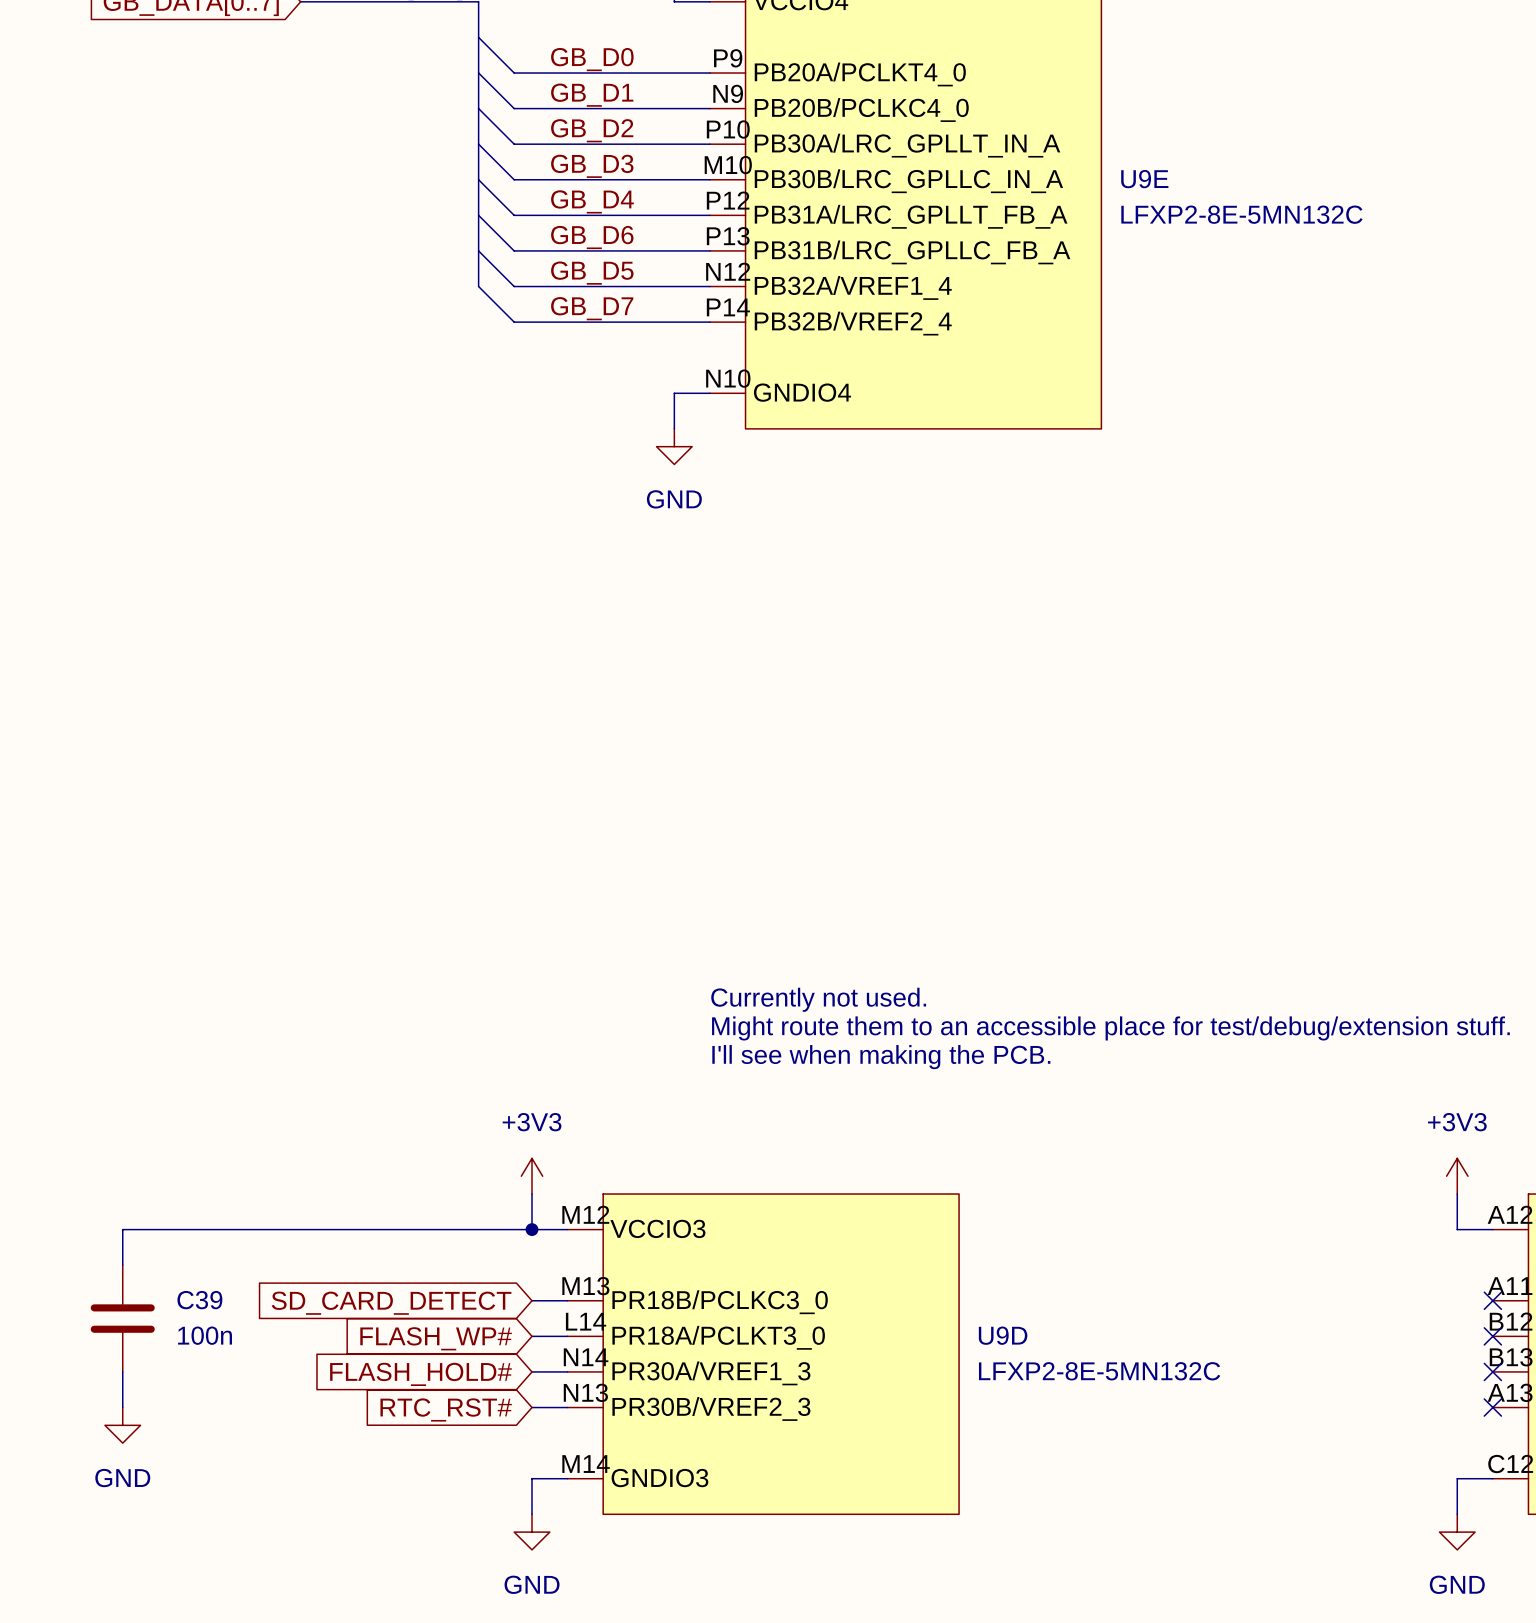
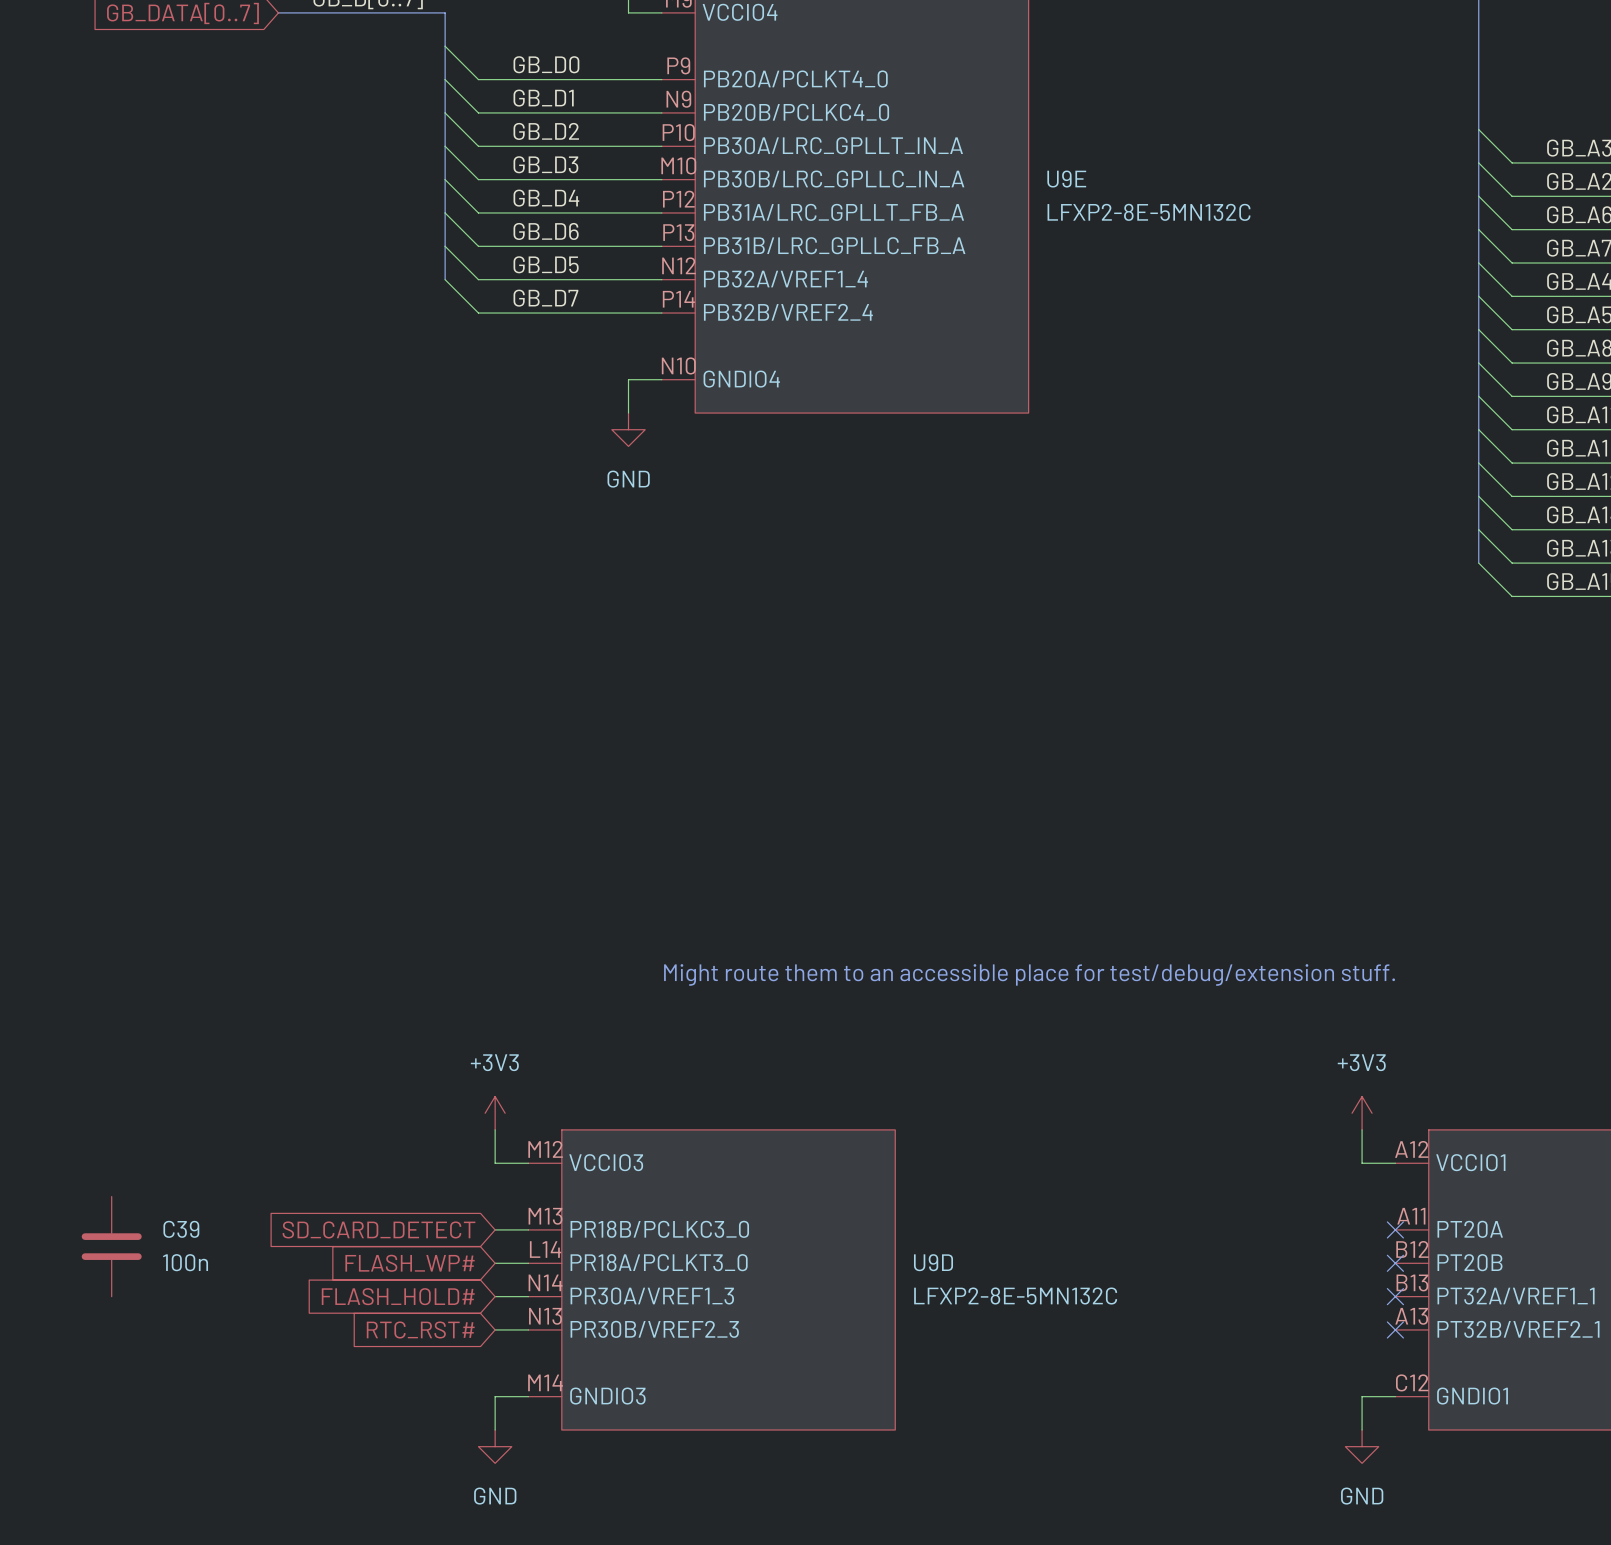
text: Currently not used. (818, 999) -> none
text: I'll see when making the PCB. (881, 1057) -> none
wire: (532, 1229) (122, 1229) (122, 1265) -> none
junction: (532, 1229) -> none
wire: (122, 1371) (122, 1407) -> none
power symbol: GND (122, 1425) -> none

